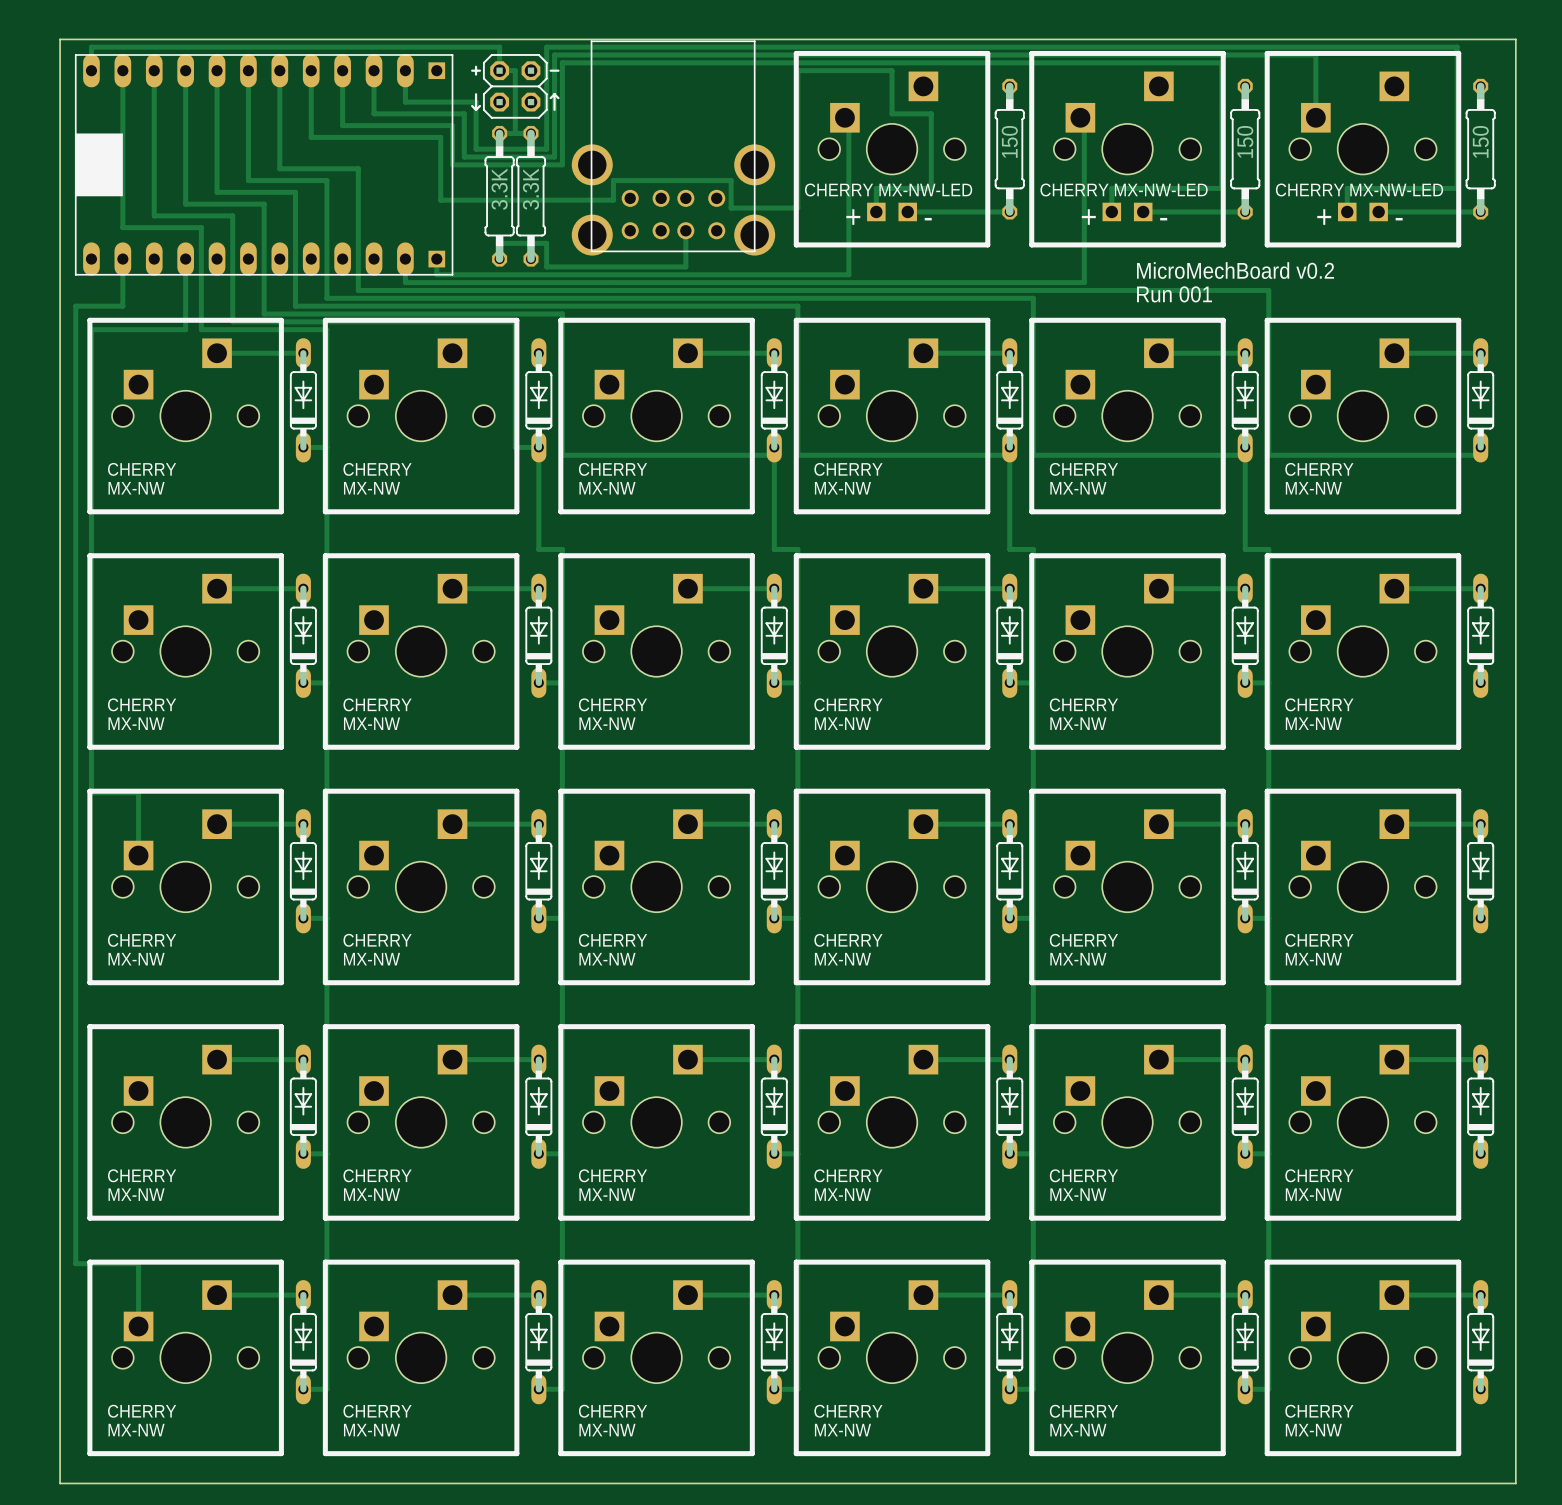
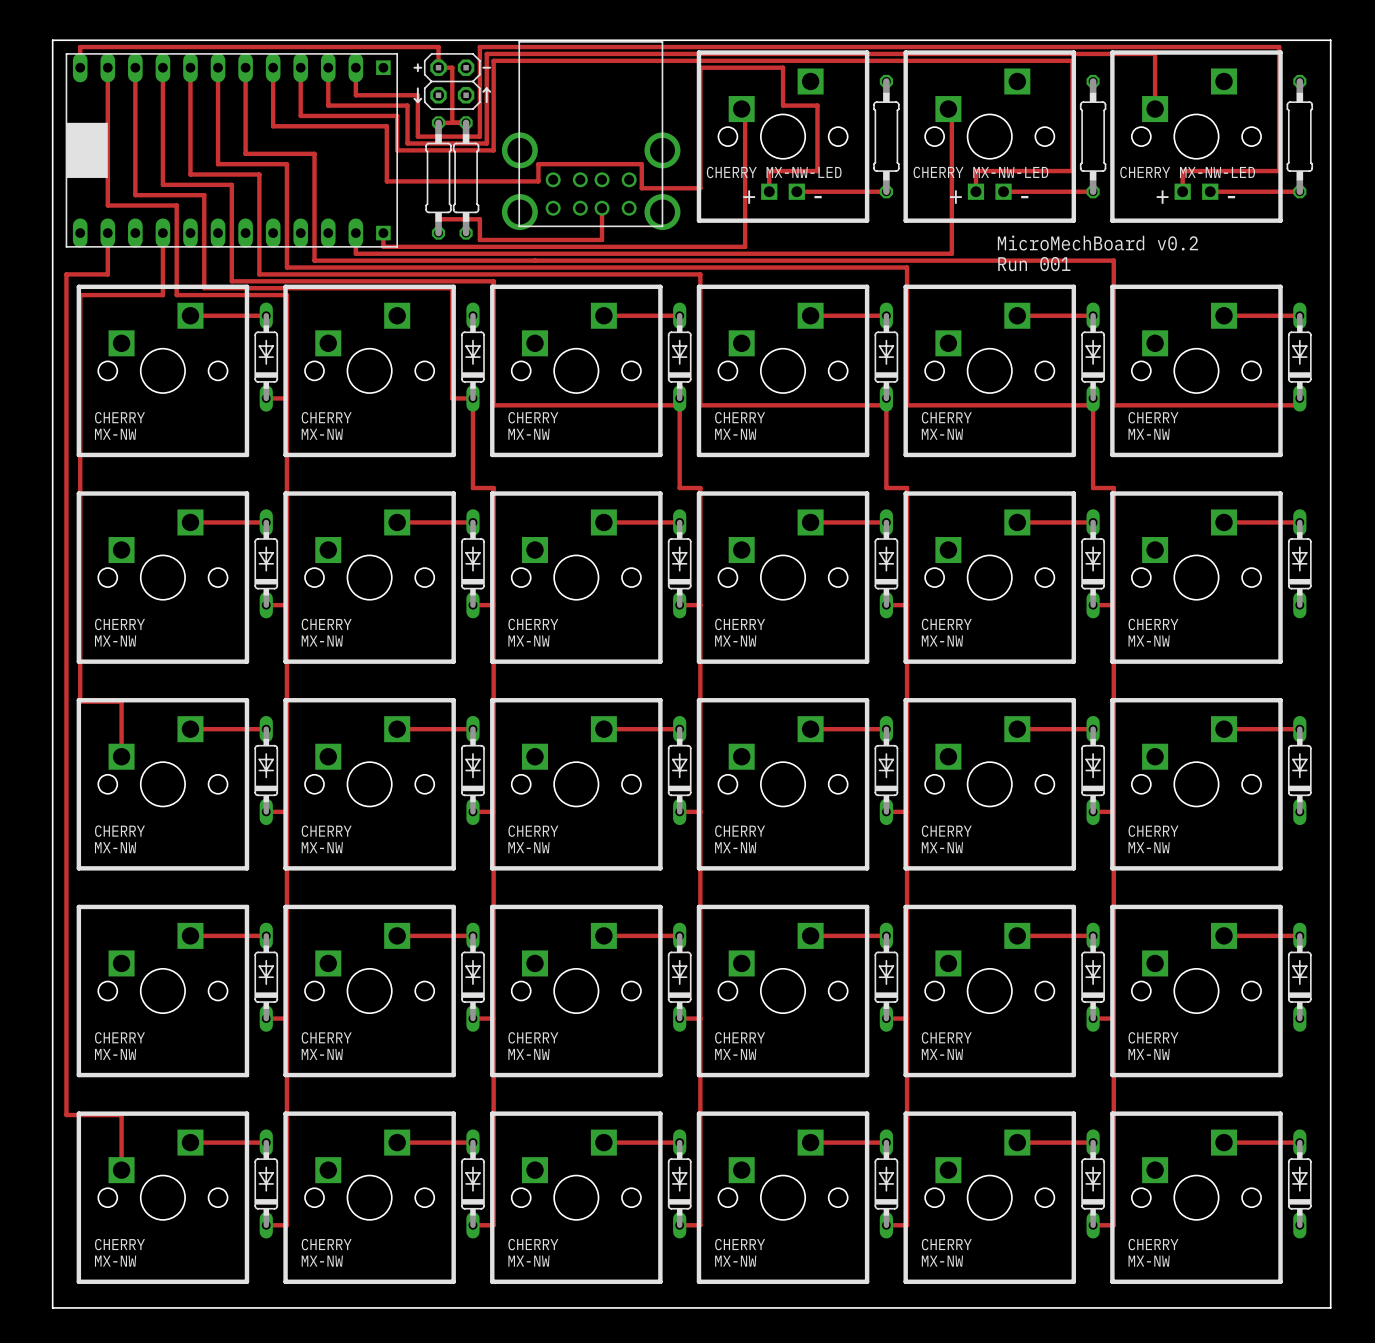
part value: 150 (1009, 141) -> none
part value: 150 (1245, 141) -> none
part value: 150 (1480, 141) -> none
part value: 3.3K (499, 189) -> none
part value: 3.3K (530, 189) -> none

